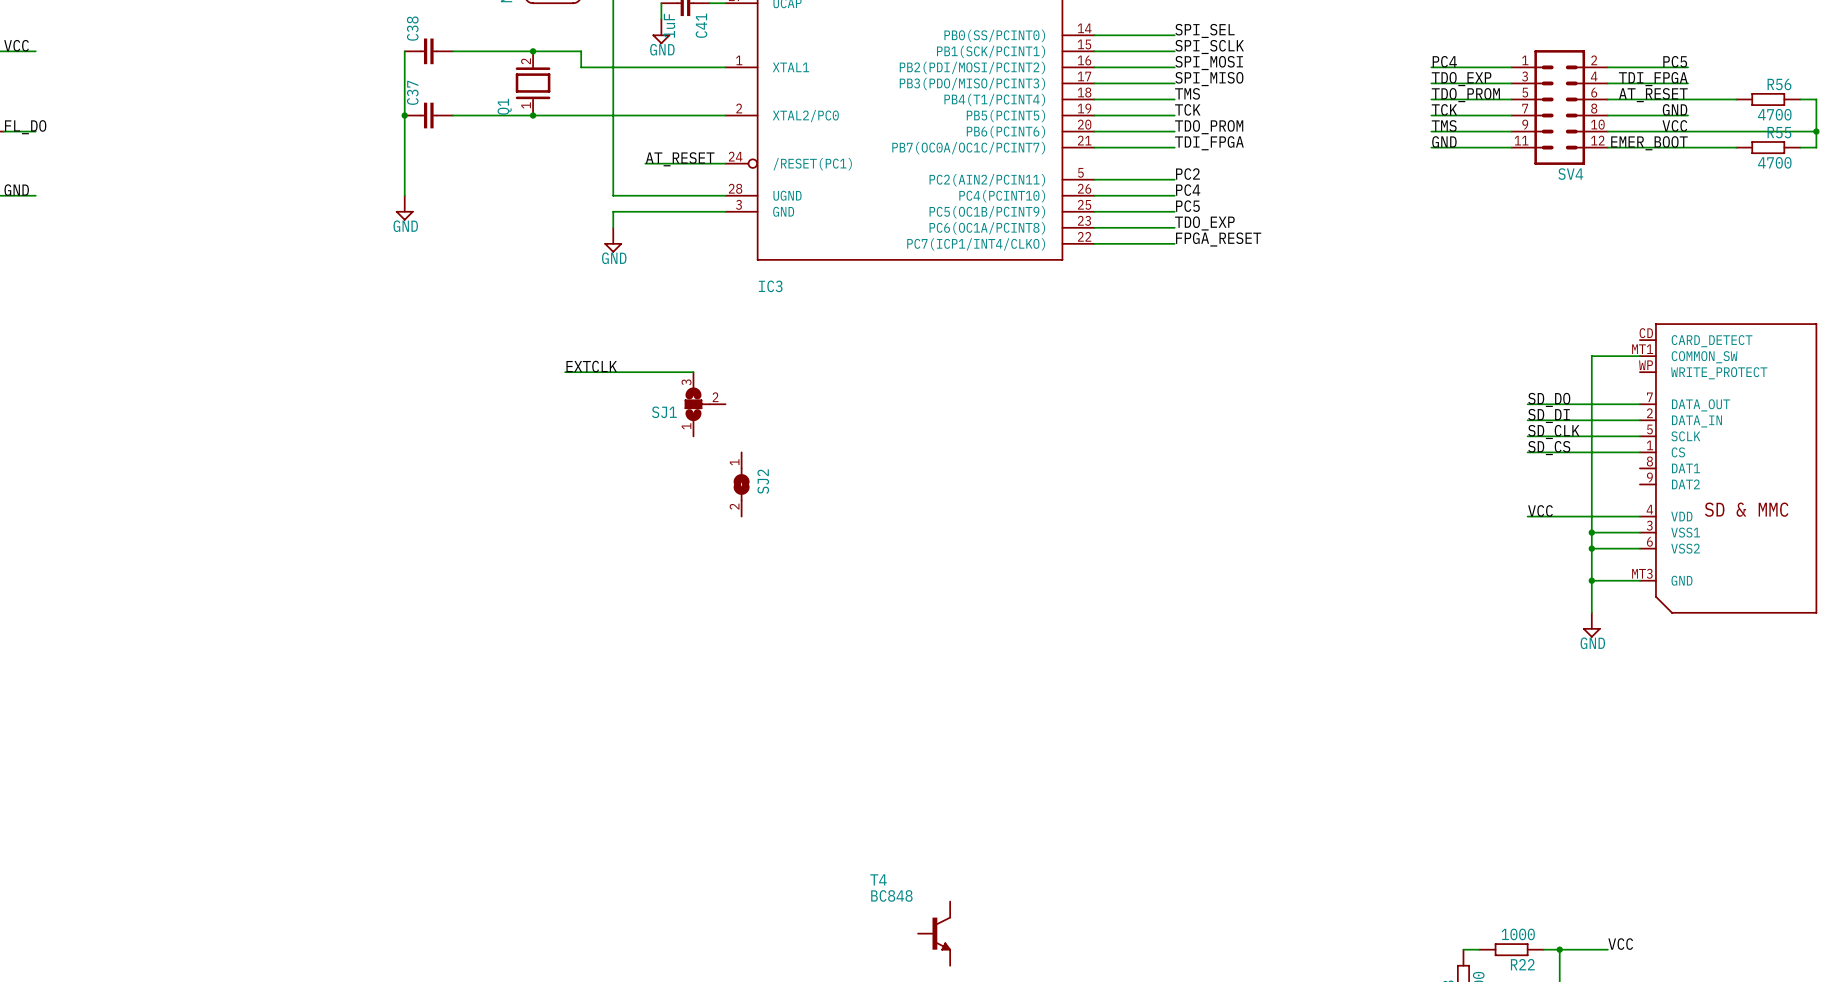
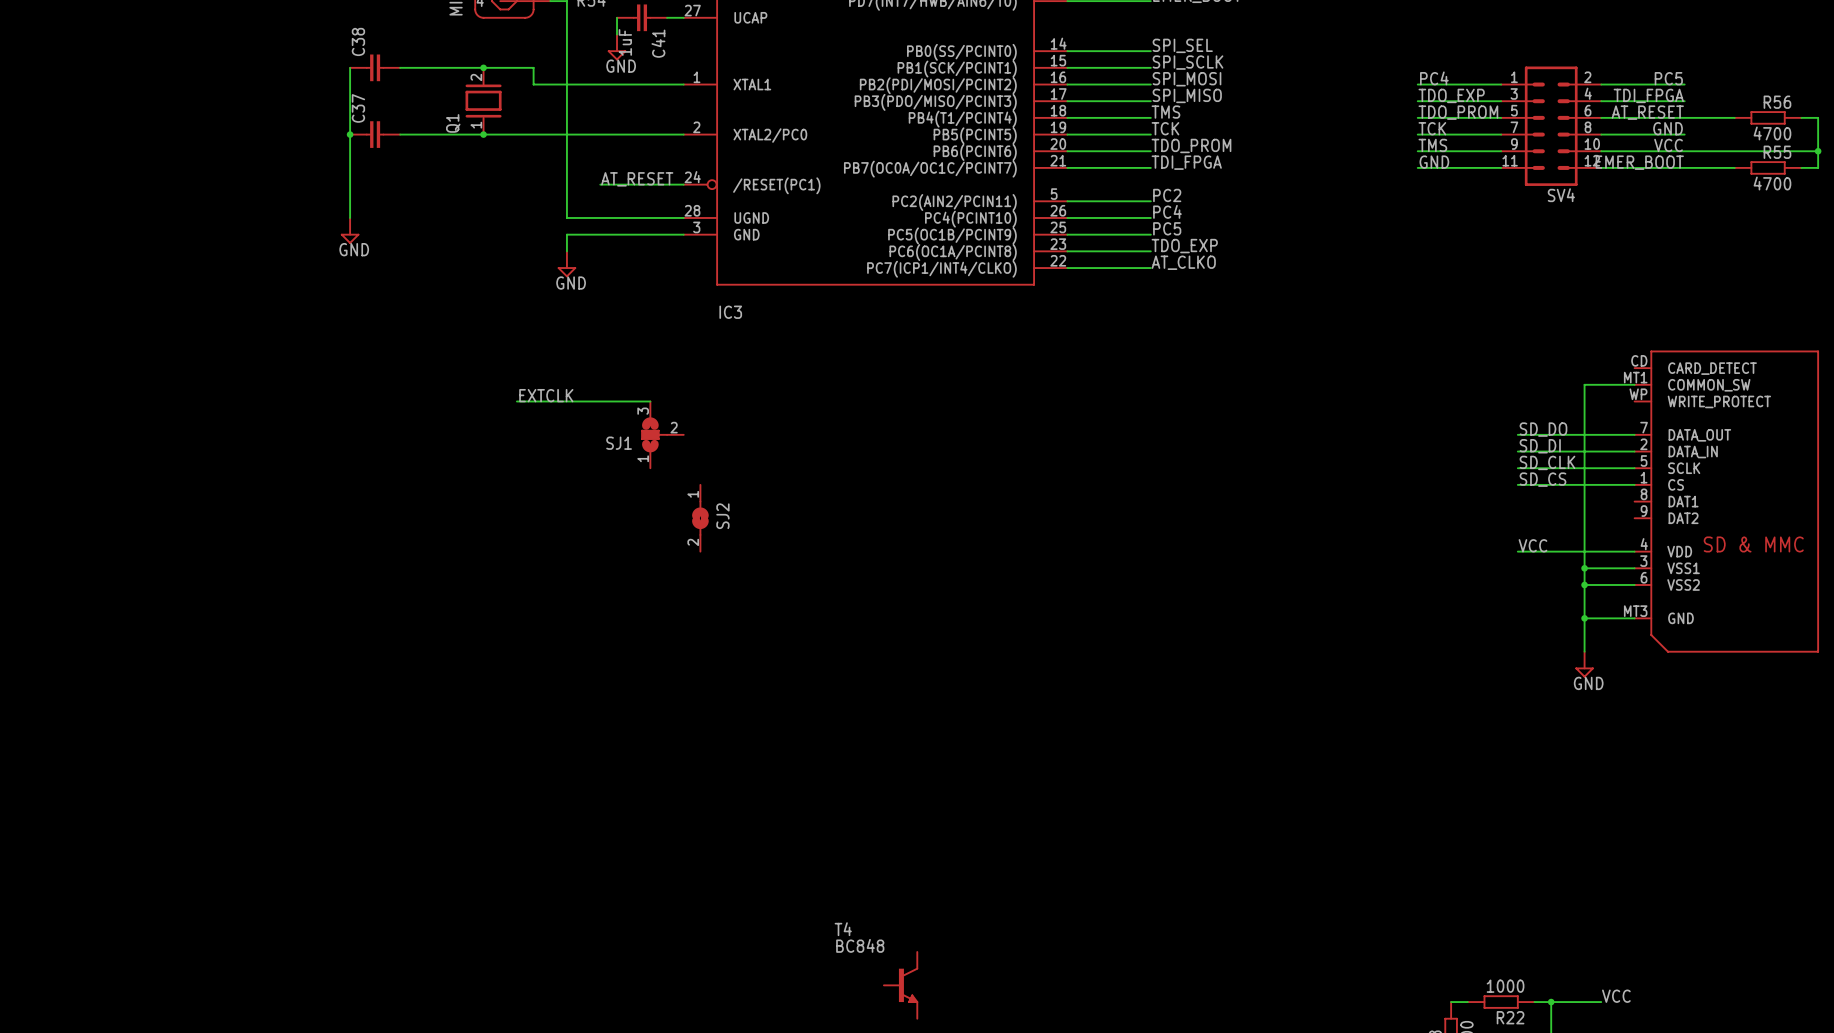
label: FPGA_RESET (1218, 239) -> AT_CLKO (1183, 262)

